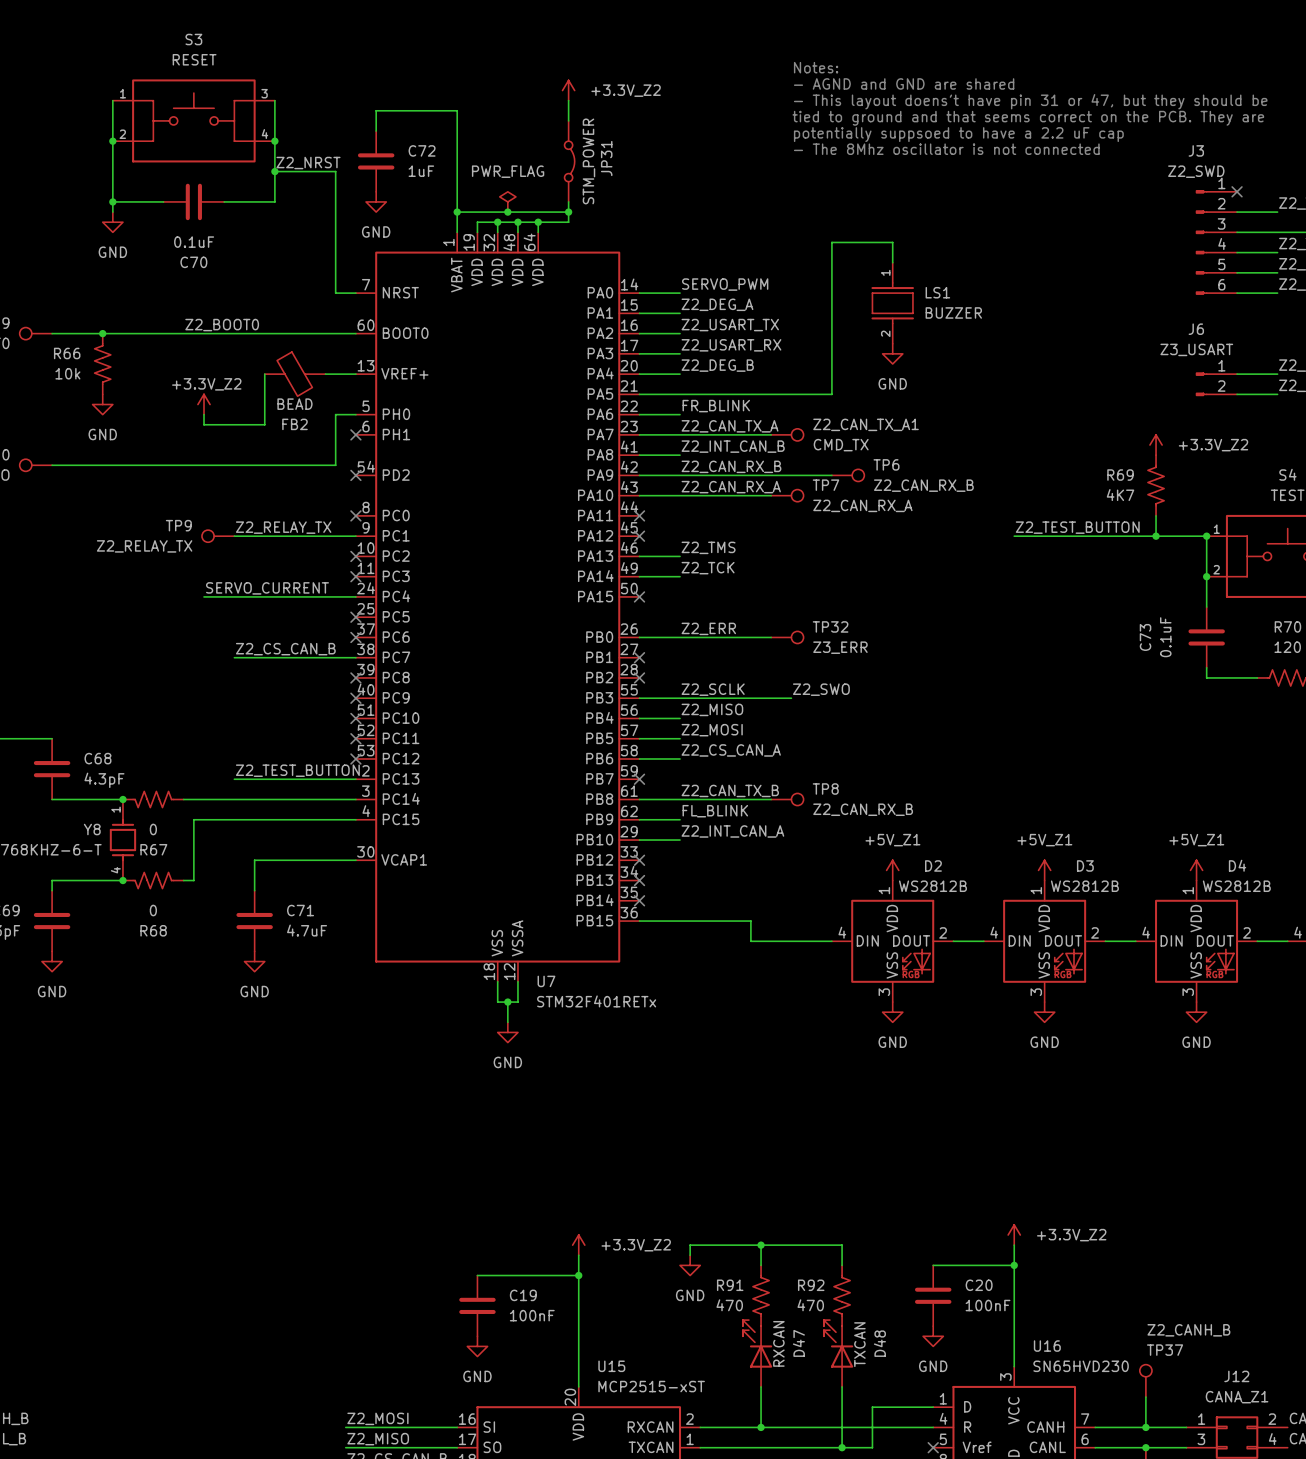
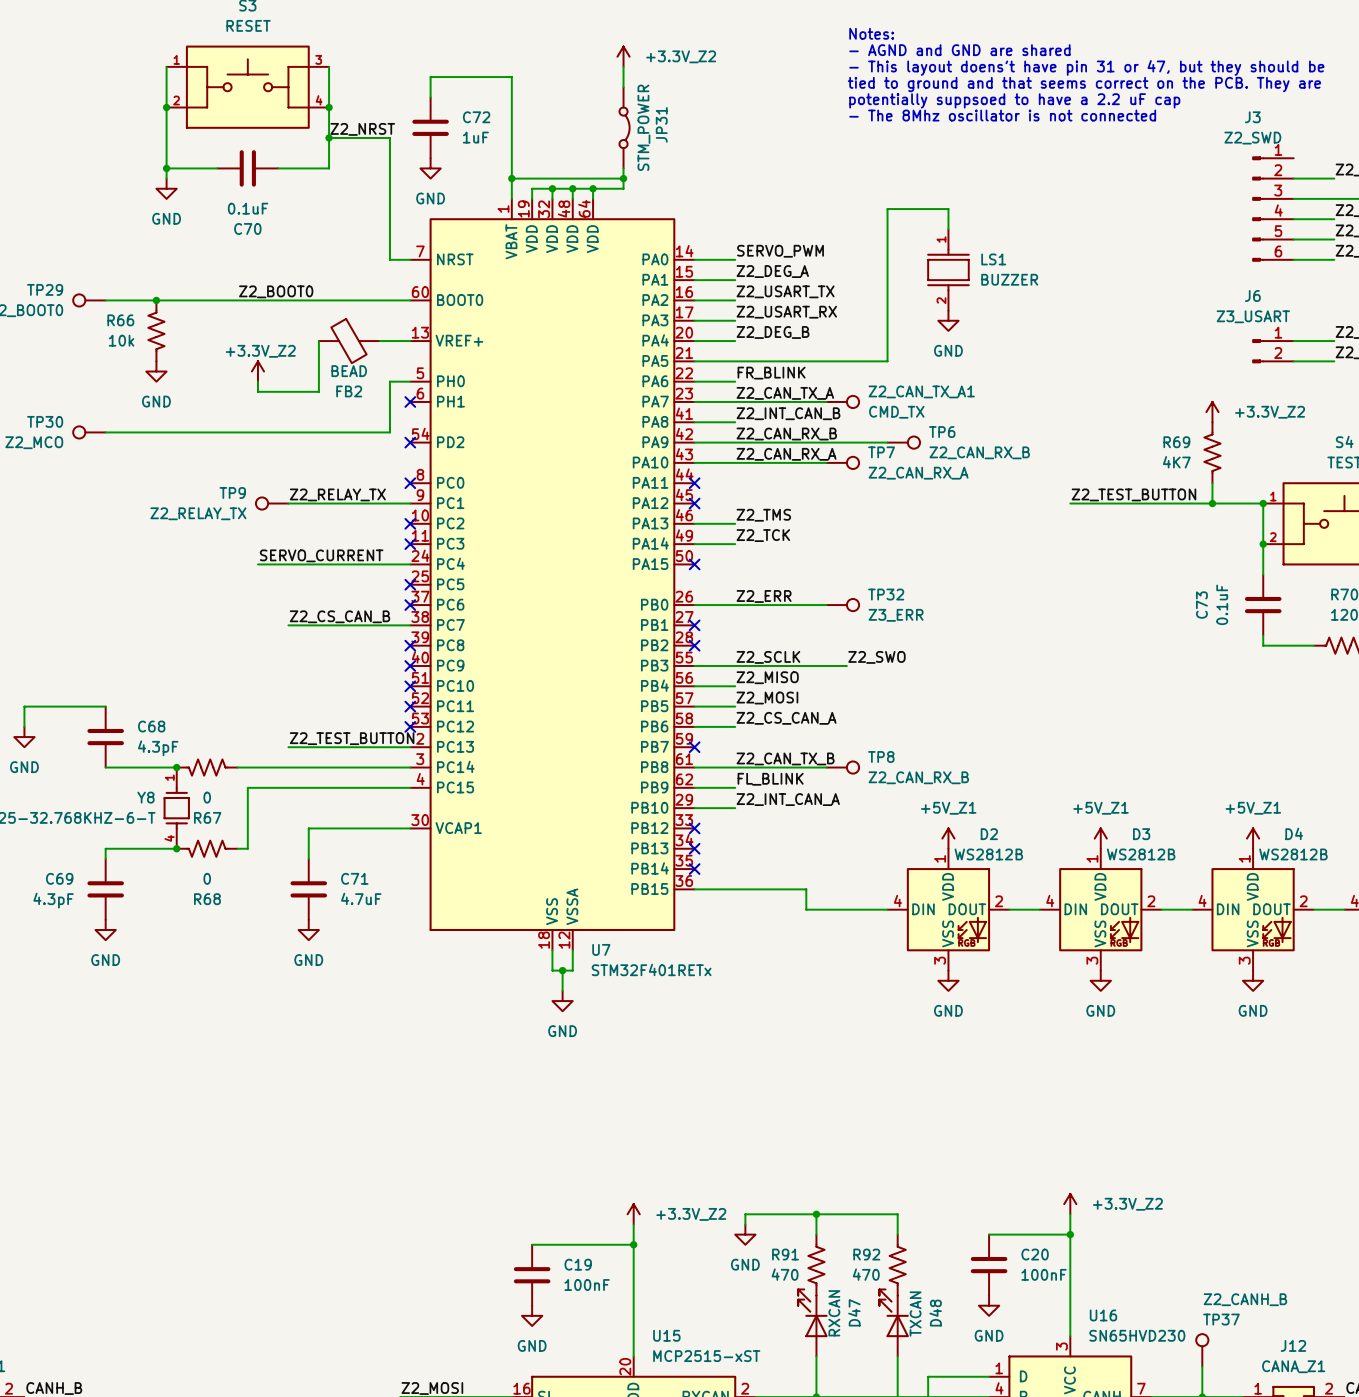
no-connect mark: (1237, 191) -> none
power symbol: PWR_FLAG (507, 201) -> none
junction: (507, 212) -> none

